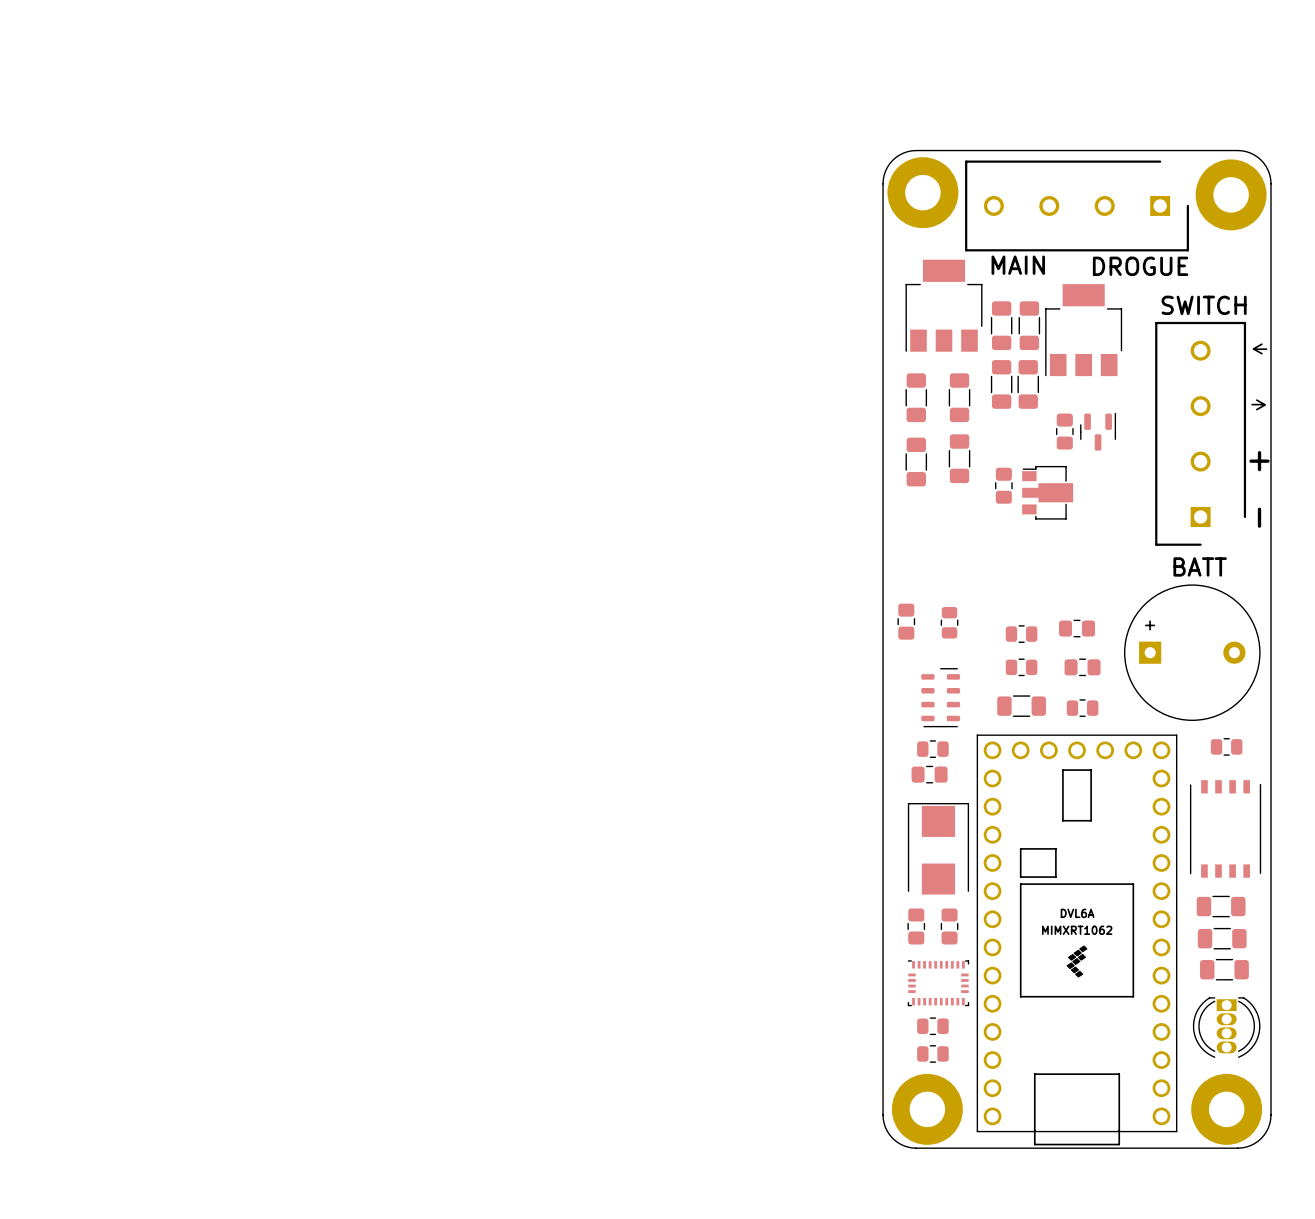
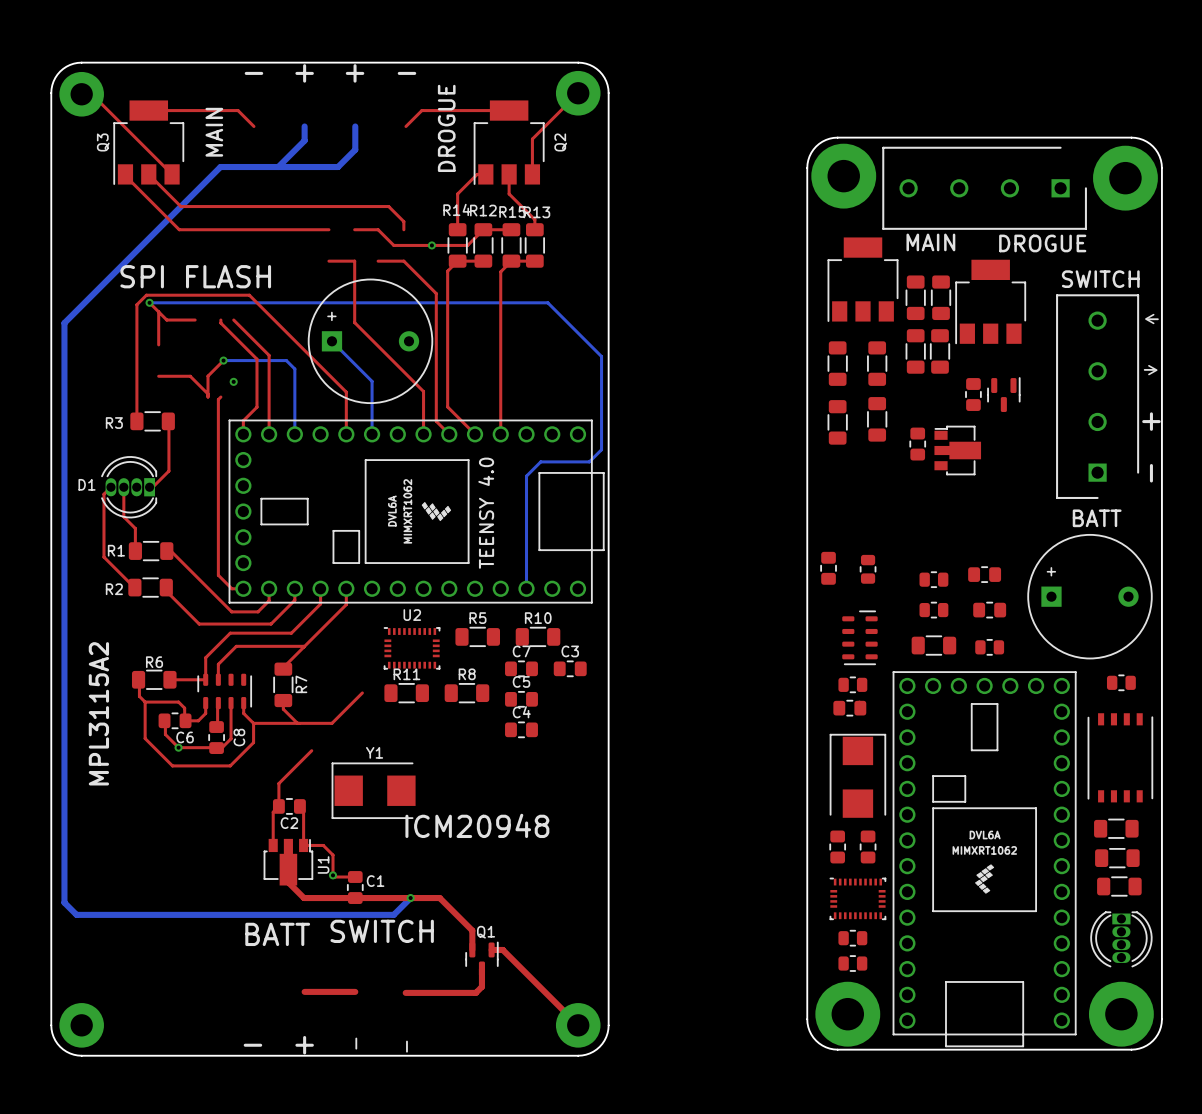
board edge: none -> (81, 62) (578, 62) (593, 66) (604, 77) (608, 93) (608, 1025) (604, 1040) (593, 1051) (578, 1055) (81, 1055) (66, 1051) (55, 1040) (51, 1025) (51, 93) (53, 81) (60, 71) (70, 64) (81, 62)
text: none -> - (253, 73)
text: none -> + (304, 73)
text: none -> + (355, 73)
text: none -> - (406, 73)
top track: none -> (578, 93) (532, 139) (532, 174)
part: none -> (578, 93)
top track: none -> (81, 94) (91, 94) (172, 174)
part: none -> (81, 94)
top track: none -> (148, 110) (238, 110) (253, 126)
top track: none -> (509, 110) (421, 110) (405, 126)
bottom track: none -> (304, 126) (304, 140) (278, 167)
bottom track: none -> (355, 126) (355, 149) (338, 167) (220, 167) (64, 323) (64, 902) (76, 914) (393, 914) (410, 898)
text: none -> DROGUE (446, 128)
text: none -> MAIN (214, 132)
Q3: none -> (148, 142)
Q2: none -> (509, 142)
top track: none -> (125, 174) (179, 229) (328, 229)
top track: none -> (148, 174) (180, 206) (388, 206) (403, 221) (403, 229)
top track: none -> (485, 174) (477, 174) (457, 193) (457, 229)
top track: none -> (509, 174) (509, 193) (534, 219) (534, 229)
top track: none -> (354, 229) (378, 229) (393, 245) (467, 245) (483, 229) (511, 229)
via: none -> (431, 245)
R14: none -> (457, 245)
R12: none -> (483, 245)
R13: none -> (511, 245)
R15: none -> (534, 245)
top track: none -> (328, 261) (354, 261) (354, 322) (423, 391) (423, 434)
top track: none -> (378, 261) (403, 261) (436, 293) (436, 421) (449, 434)
top track: none -> (483, 261) (457, 261) (447, 271) (447, 406) (475, 434)
top track: none -> (534, 261) (511, 261) (500, 271) (500, 434)
text: none -> SPI FLASH (195, 276)
top track: none -> (149, 302) (166, 320) (195, 320)
bottom track: none -> (149, 302) (547, 302) (601, 356) (601, 449) (589, 461) (540, 461) (526, 476) (526, 588)
via: none -> (149, 302)
top track: none -> (158, 311) (158, 344)
top track: none -> (220, 320) (220, 323) (257, 359) (257, 407) (243, 420) (243, 434)
top track: none -> (233, 320) (269, 355) (269, 434)
bottom track: none -> (331, 341) (372, 381) (372, 434)
part: none -> (370, 341)
top track: none -> (223, 360) (208, 376) (208, 397)
bottom track: none -> (223, 360) (286, 360) (294, 369) (294, 434)
via: none -> (223, 360)
top track: none -> (158, 376) (190, 376) (208, 394)
via: none -> (233, 381)
top track: none -> (220, 397) (218, 399) (218, 575) (231, 588) (243, 588)
top track: none -> (136, 421) (136, 304) (146, 295) (249, 295) (346, 392) (346, 434)
R3: none -> (152, 421)
top track: none -> (168, 421) (168, 471) (152, 487)
top track: none -> (110, 487) (103, 494) (103, 557) (134, 587)
top track: none -> (123, 487) (123, 516) (135, 528) (135, 551)
D1: none -> (129, 487)
part: none -> (416, 511)
text: none -> TEENSY 4.0 (486, 513)
top track: none -> (168, 549) (231, 611) (258, 611) (269, 600) (269, 588)
R1: none -> (151, 551)
R2: none -> (150, 587)
top track: none -> (294, 588) (294, 600) (271, 624) (199, 624) (169, 594)
top track: none -> (320, 588) (320, 604) (291, 633) (230, 633) (205, 657) (205, 679) (169, 679)
top track: none -> (346, 588) (346, 604) (283, 667) (283, 670)
R5: none -> (477, 636)
R10: none -> (538, 636)
top track: none -> (304, 646) (236, 646) (218, 664) (218, 679)
U2: none -> (412, 648)
C7: none -> (521, 668)
C3: none -> (570, 668)
top track: none -> (139, 679) (139, 696) (145, 702)
R6: none -> (154, 679)
R7: none -> (283, 684)
part: none -> (224, 691)
top track: none -> (362, 692) (331, 723) (253, 723)
R11: none -> (406, 693)
R8: none -> (466, 693)
C5: none -> (521, 699)
top track: none -> (283, 699) (283, 709) (297, 723)
top track: none -> (145, 702) (178, 702) (184, 708) (184, 720) (198, 720) (205, 713) (205, 703)
top track: none -> (145, 702) (145, 738) (172, 765) (230, 765) (253, 742) (253, 723)
top track: none -> (218, 703) (217, 726)
top track: none -> (231, 703) (231, 738) (222, 747) (178, 747) (165, 734) (165, 720)
top track: none -> (243, 703) (243, 713) (253, 723)
text: none -> MPL3115A2 (98, 713)
C6: none -> (175, 720)
C4: none -> (521, 729)
C8: none -> (216, 737)
via: none -> (178, 747)
top track: none -> (311, 750) (278, 783) (278, 806) (273, 812) (273, 845)
Y1: none -> (373, 790)
C2: none -> (289, 806)
top track: none -> (299, 806) (303, 810) (303, 845) (323, 845) (333, 855) (333, 875) (334, 877) (355, 877)
text: none -> ICM20948 (477, 825)
U1: none -> (288, 862)
via: none -> (333, 875)
top track: none -> (288, 876) (288, 846) (288, 882) (303, 898) (439, 898) (472, 930) (472, 949)
C1: none -> (355, 887)
via: none -> (410, 898)
text: none -> SWITCH (382, 931)
text: none -> BATT (277, 934)
top track: none -> (491, 949) (502, 949) (578, 1025)
Q1: none -> (481, 959)
top track: none -> (481, 968) (481, 986) (475, 992) (405, 992)
top track: none -> (304, 991) (355, 991)
part: none -> (81, 1025)
part: none -> (578, 1025)
line: none -> (356, 1038) (356, 1048)
line: none -> (406, 1041) (406, 1051)
text: none -> - (252, 1045)
text: none -> + (304, 1045)

